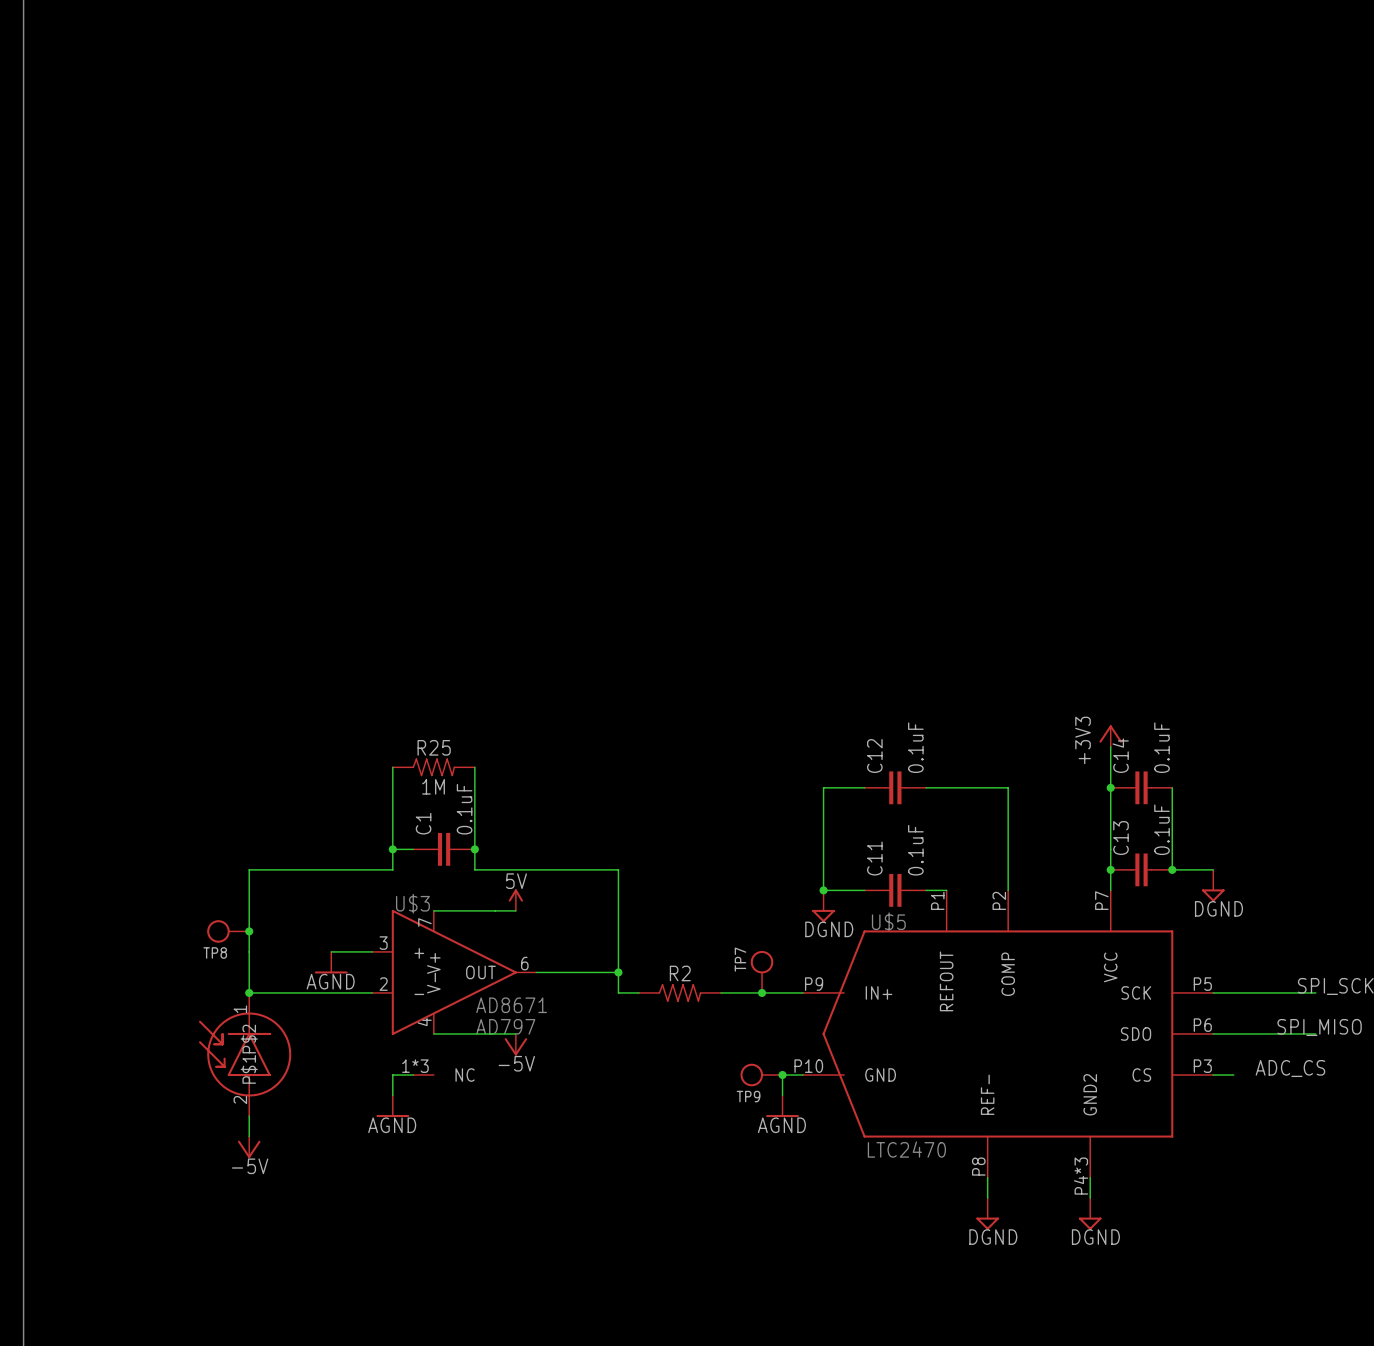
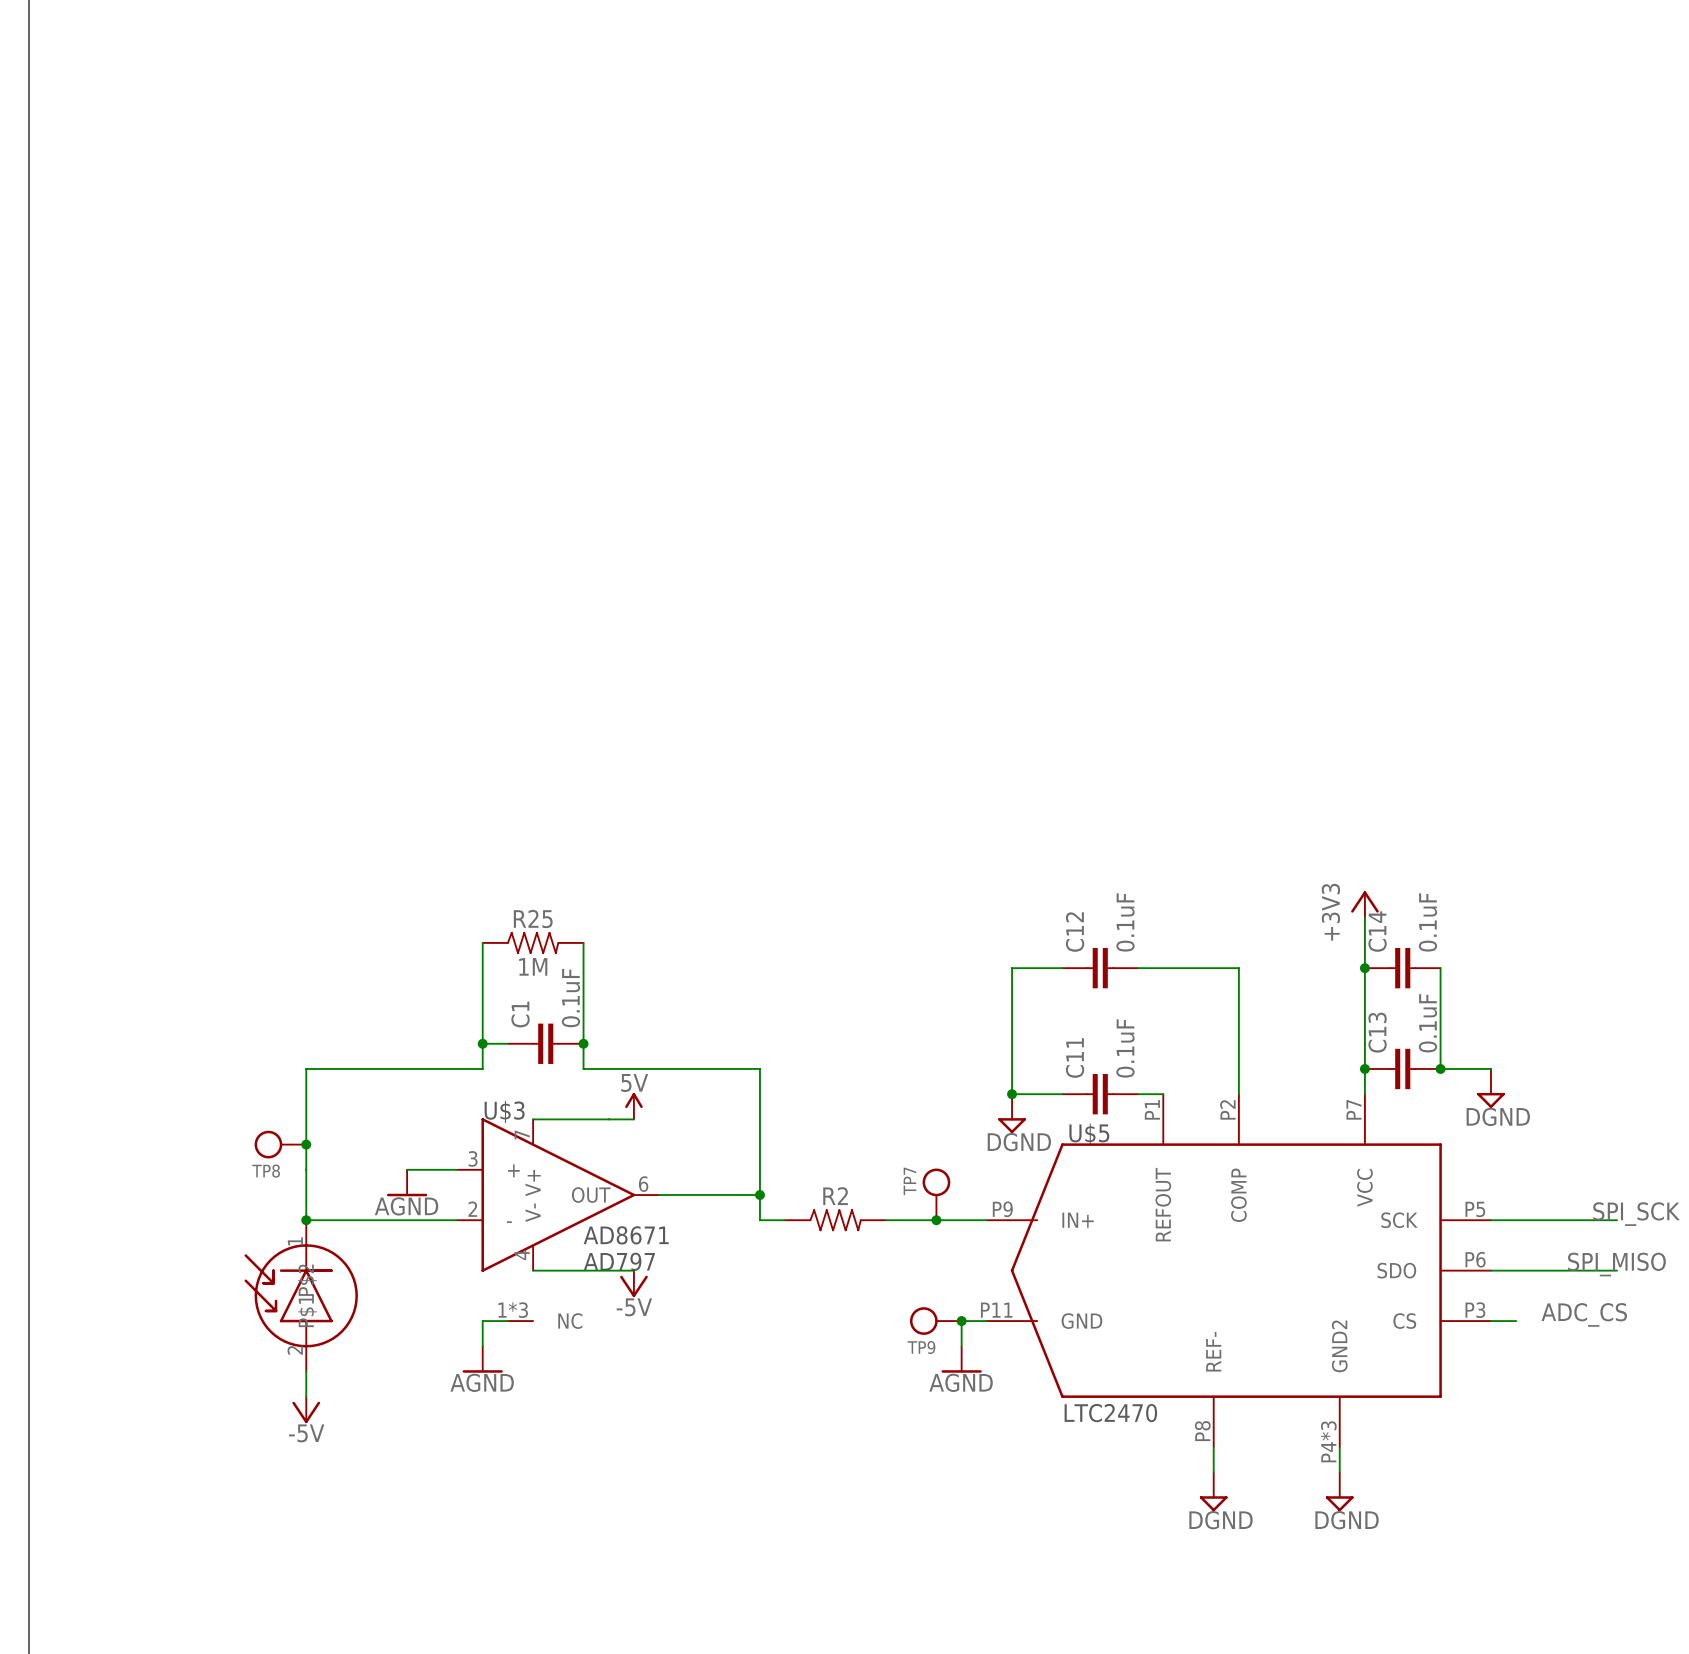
part pin number: P10 (808, 1066) -> P11 (996, 1310)

